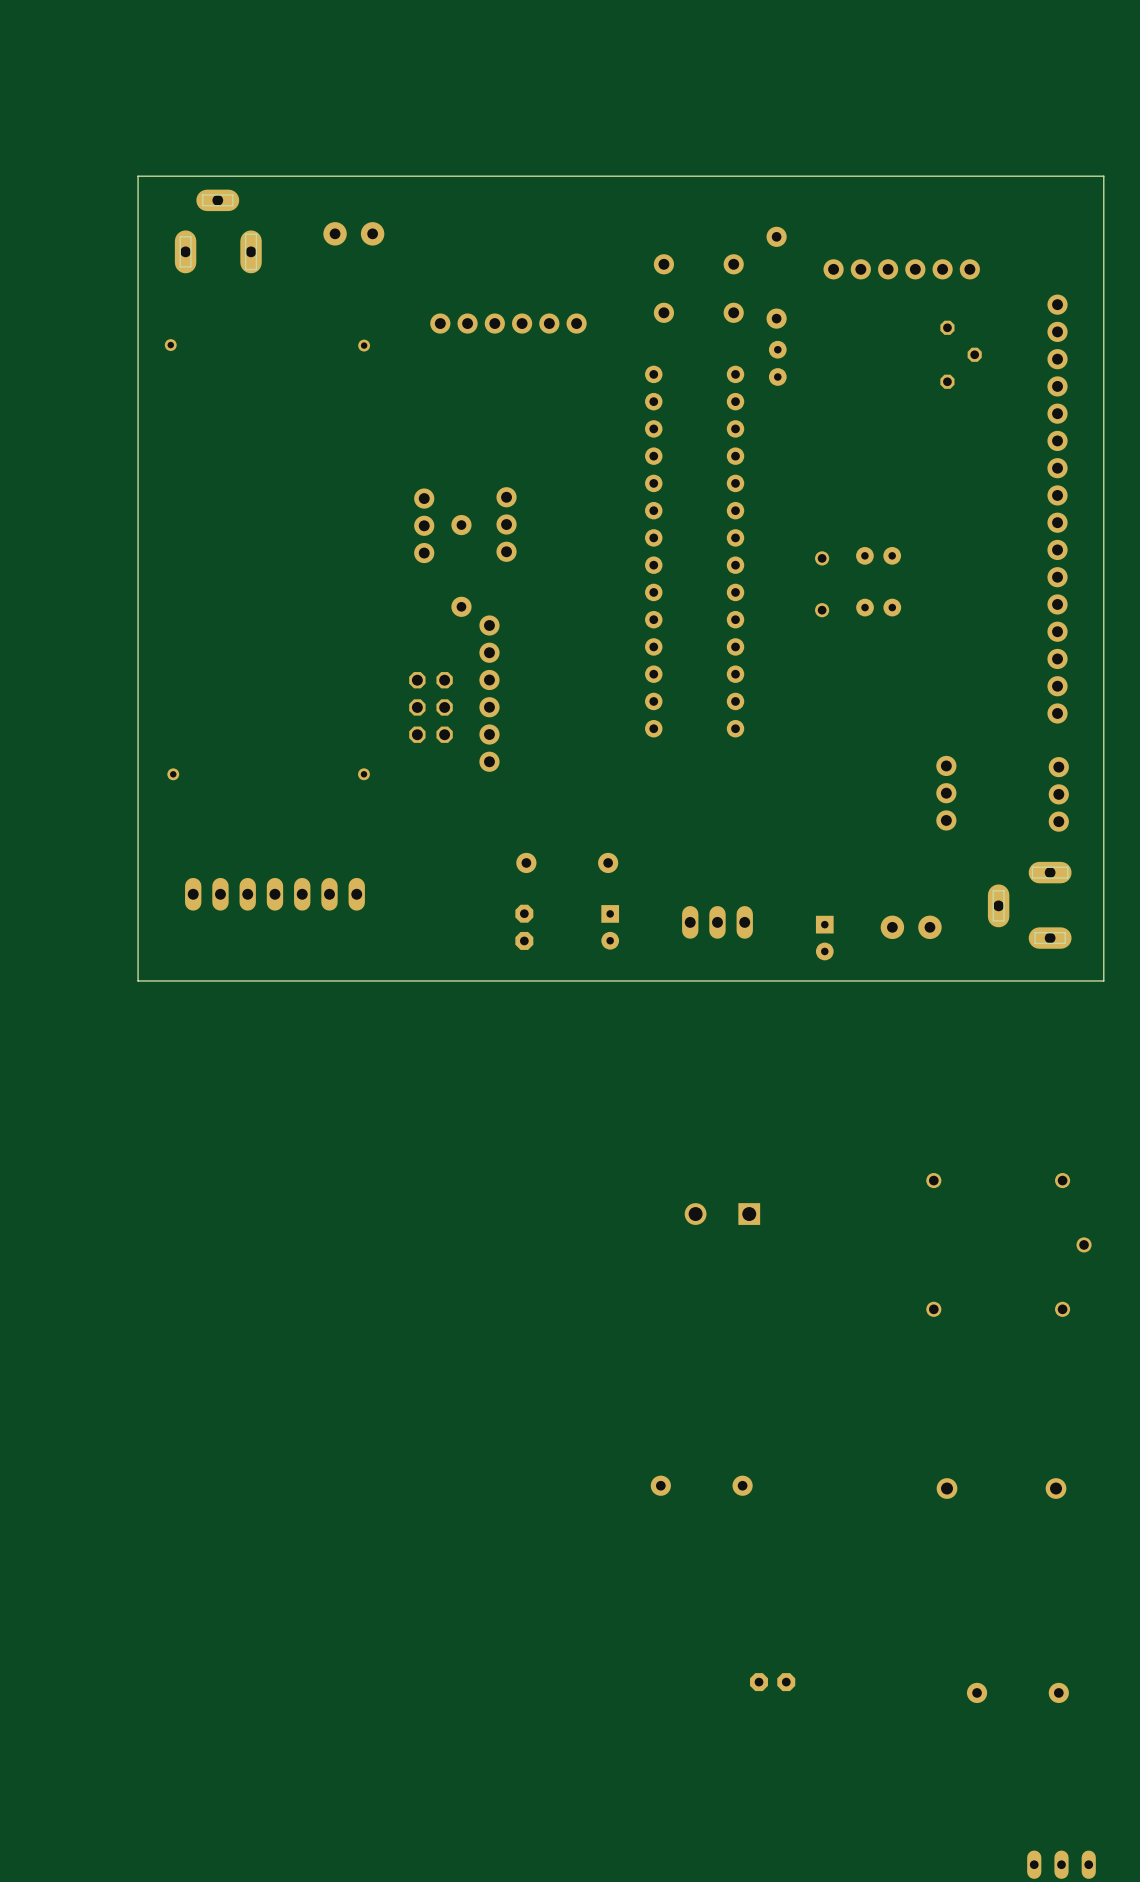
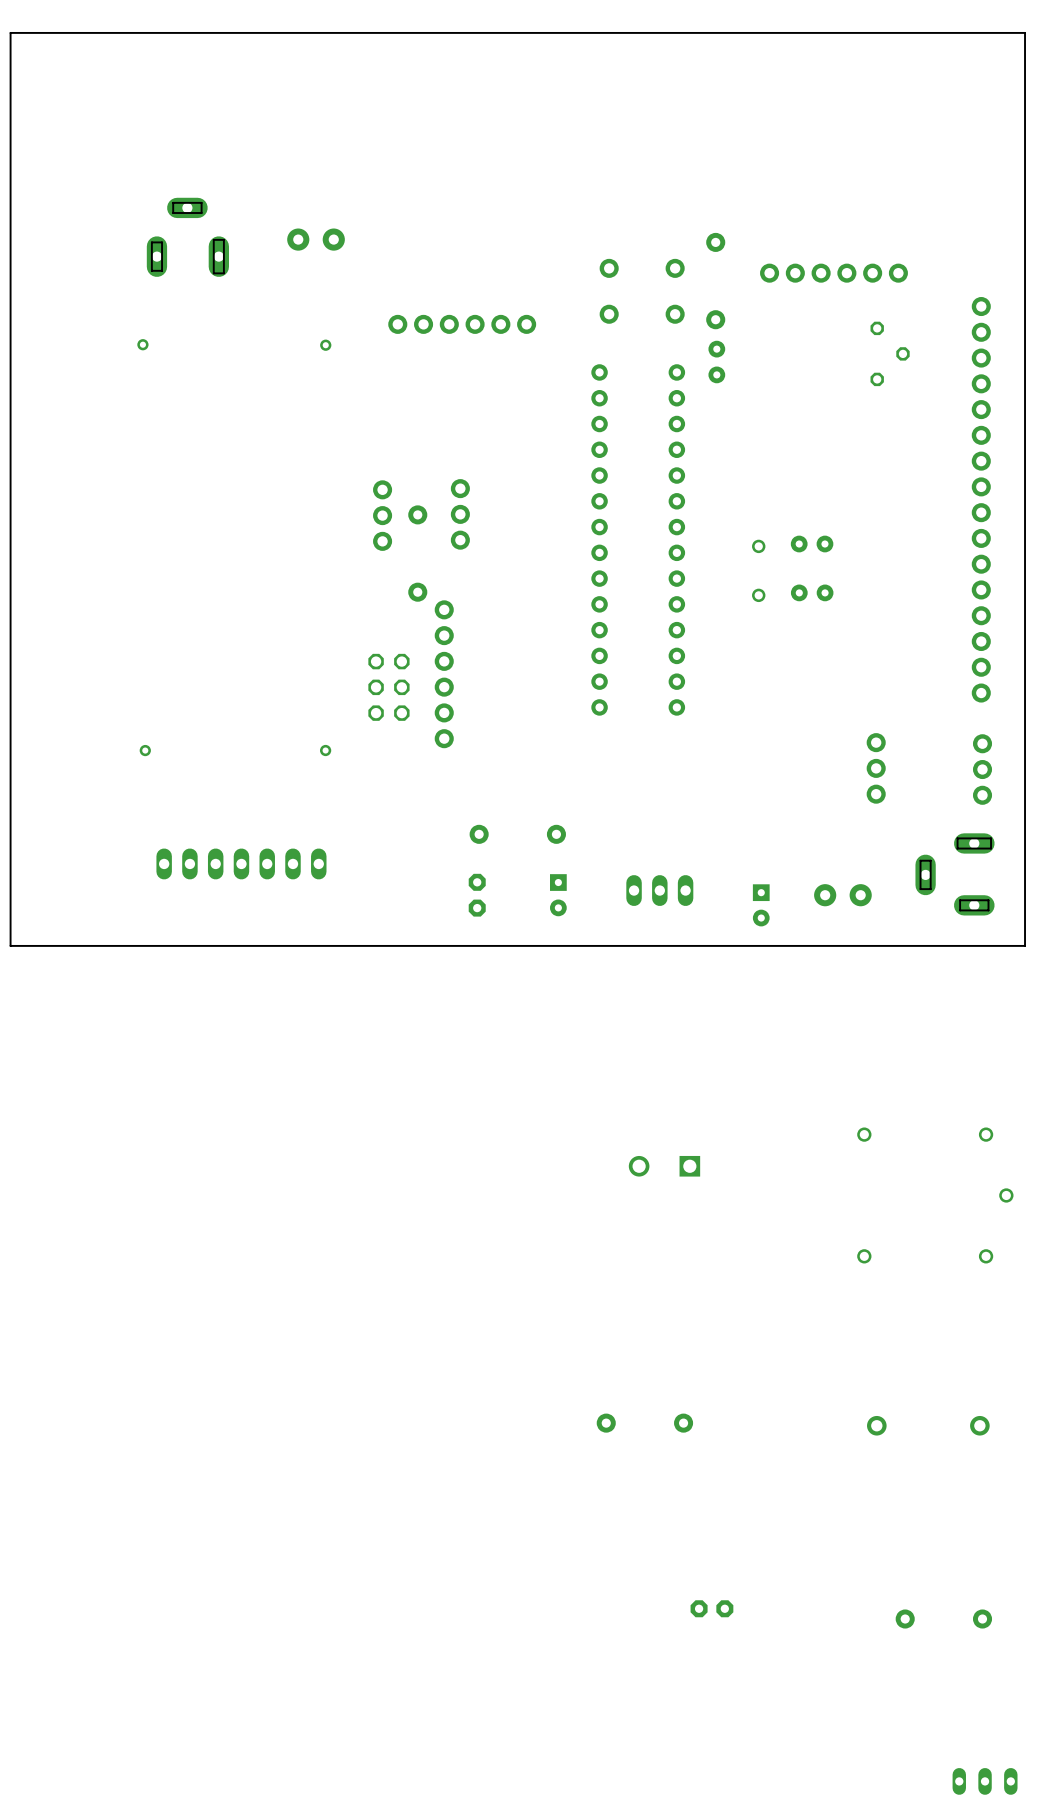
board edge: (1103, 176) (138, 176) (138, 980) -> (1025, 185) (1025, 32) (10, 32) (10, 945) (112, 945)

